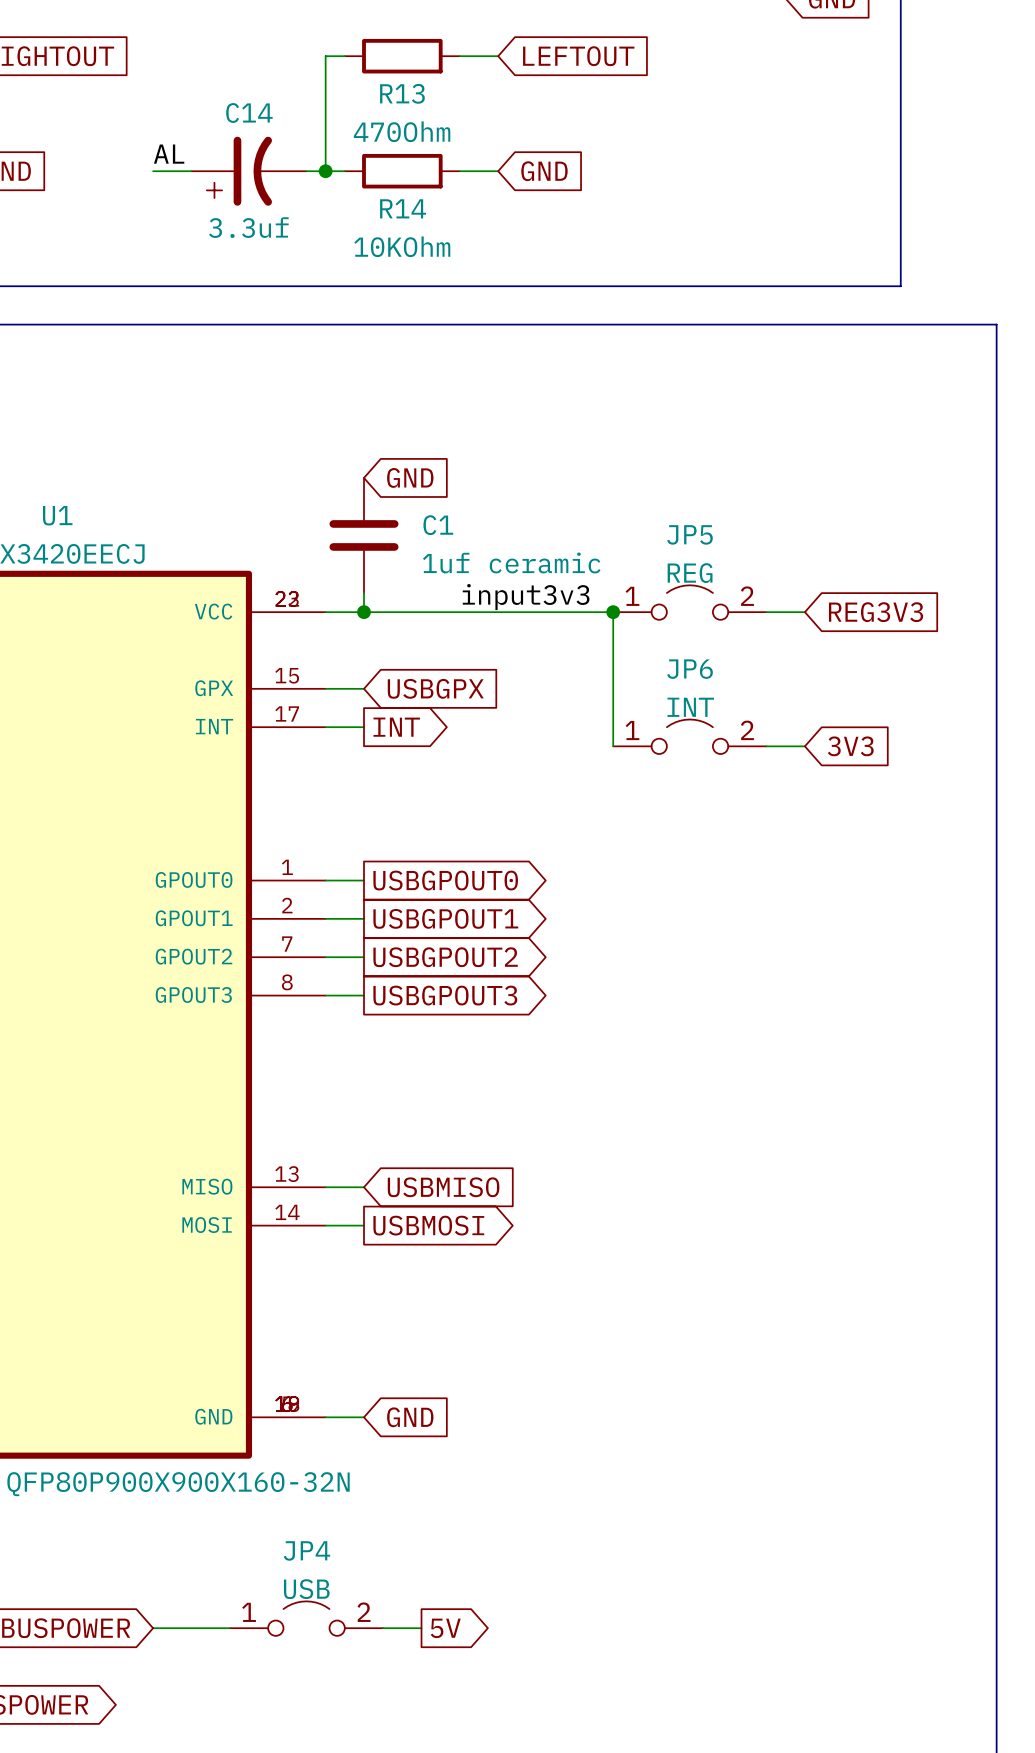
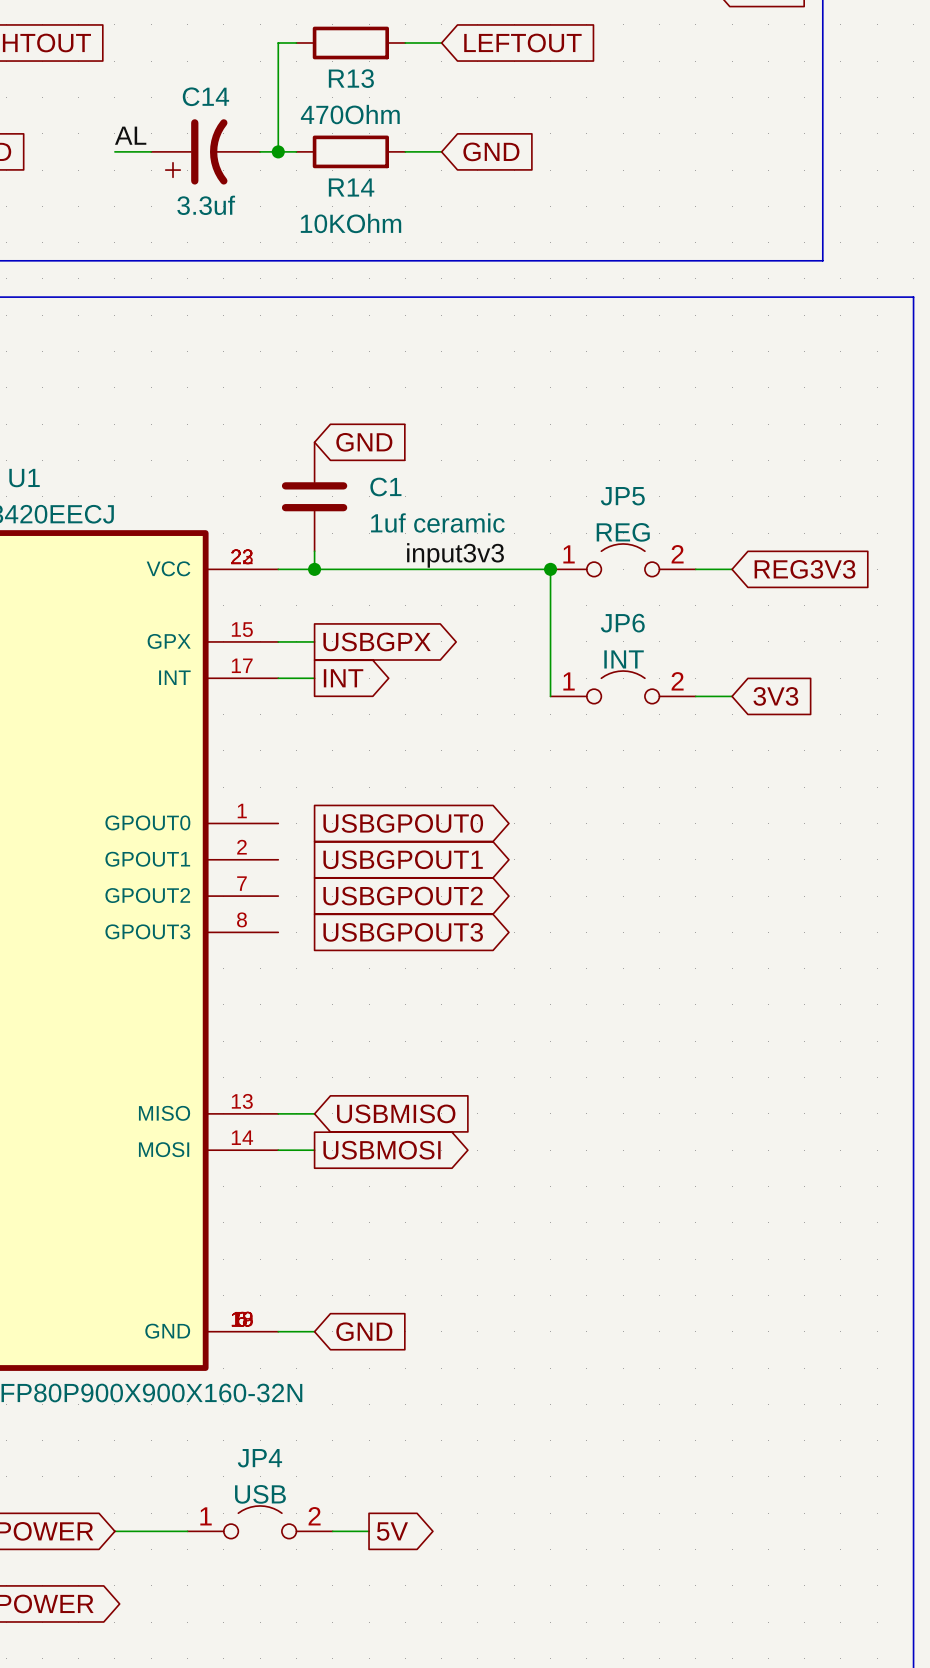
global label shape: input (435, 688) -> output (377, 641)
wire: (325, 880) (363, 880) -> none
wire: (325, 918) (363, 918) -> none
wire: (325, 957) (363, 957) -> none
wire: (325, 995) (363, 995) -> none

